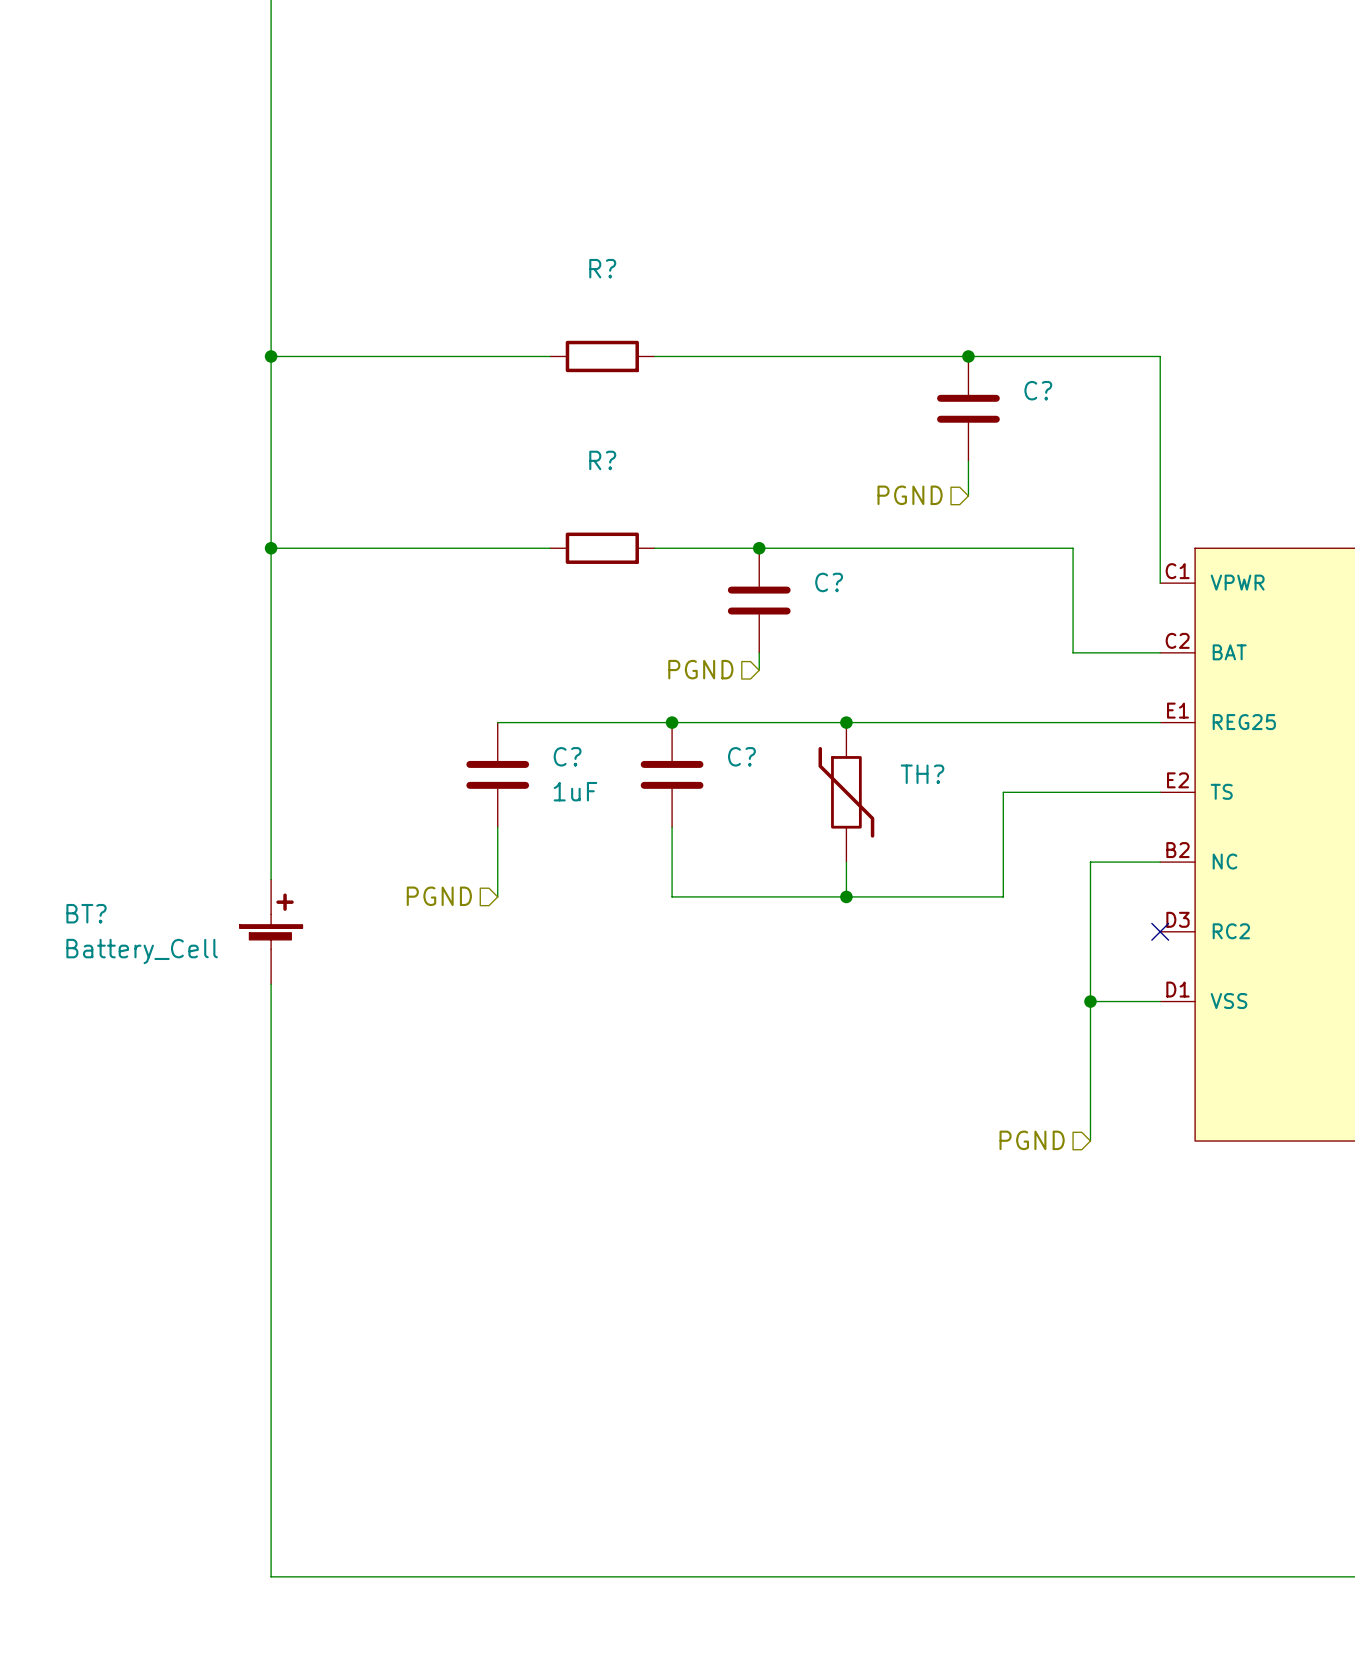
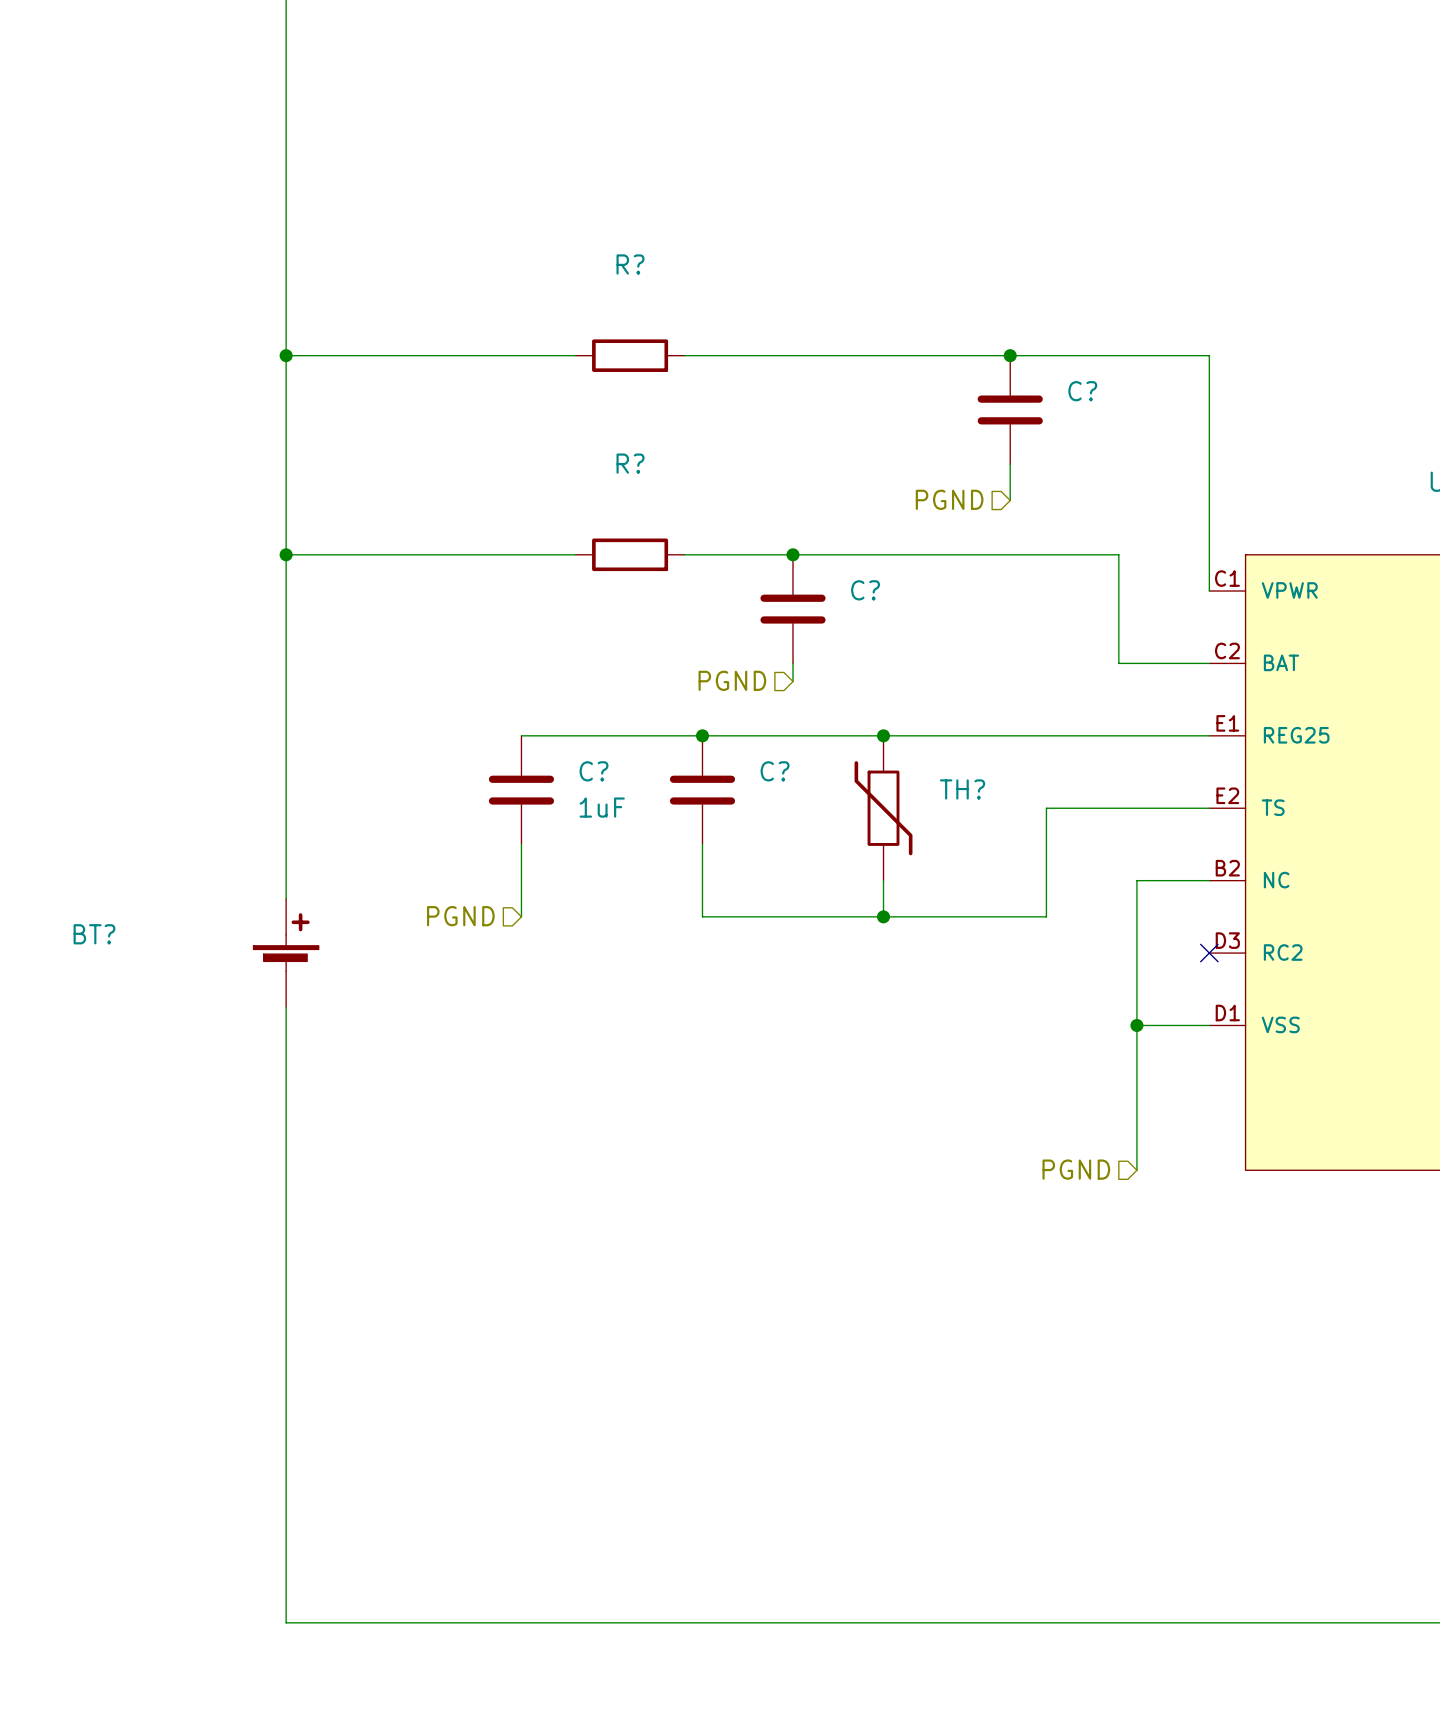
BT? value: Battery_Cell (142, 951) -> none

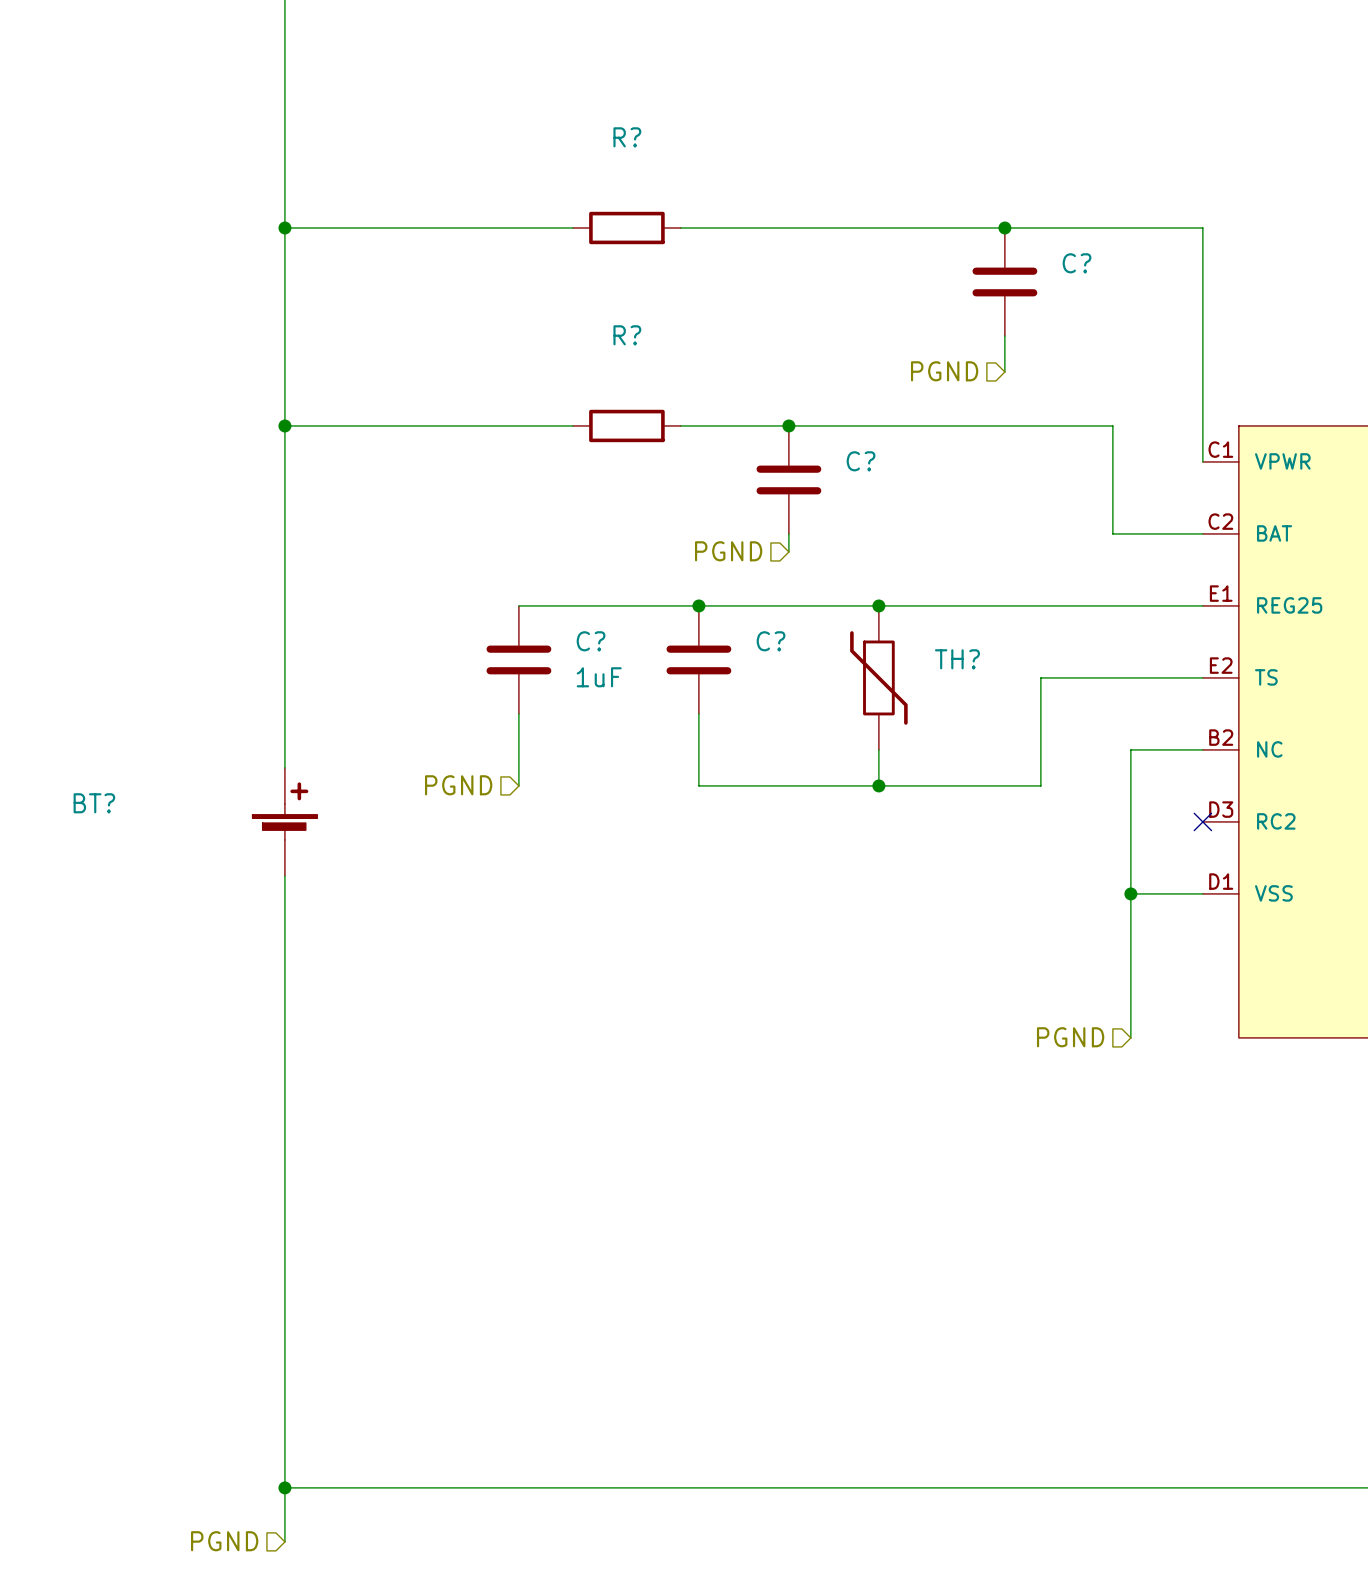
wire: none -> (284, 1487) (284, 1541)
junction: none -> (284, 1487)
hierarchical label: none -> PGND (224, 1541)

